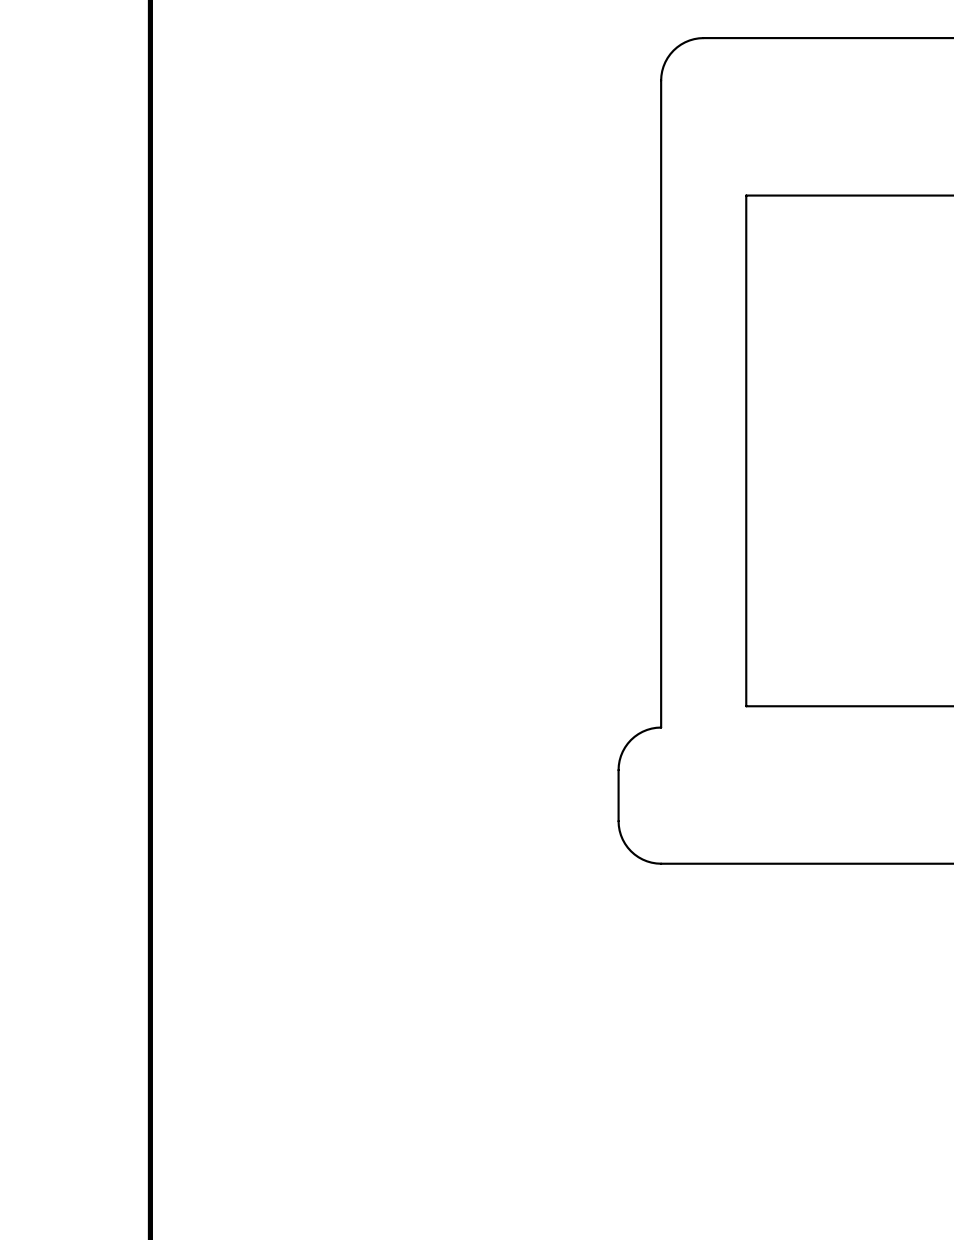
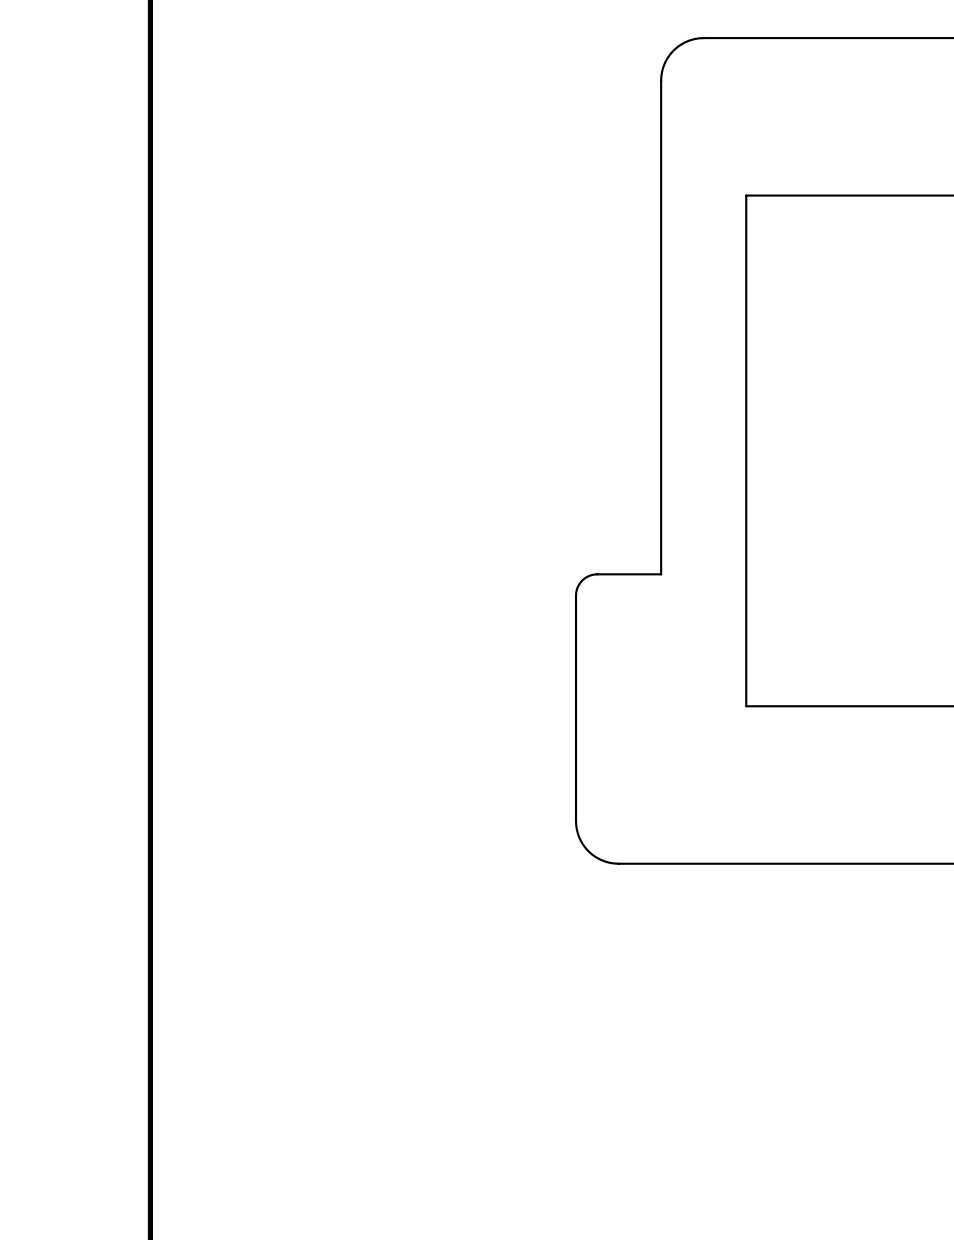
board edge: (661, 574) (661, 727) (642, 731) (631, 740) (622, 751) (618, 770) (618, 825) (622, 839) (627, 847) (638, 857) (647, 861) (661, 863) -> (661, 574) (591, 575) (580, 582) (576, 595) (576, 821) (578, 835) (588, 851) (604, 861) (618, 863) (661, 863)

